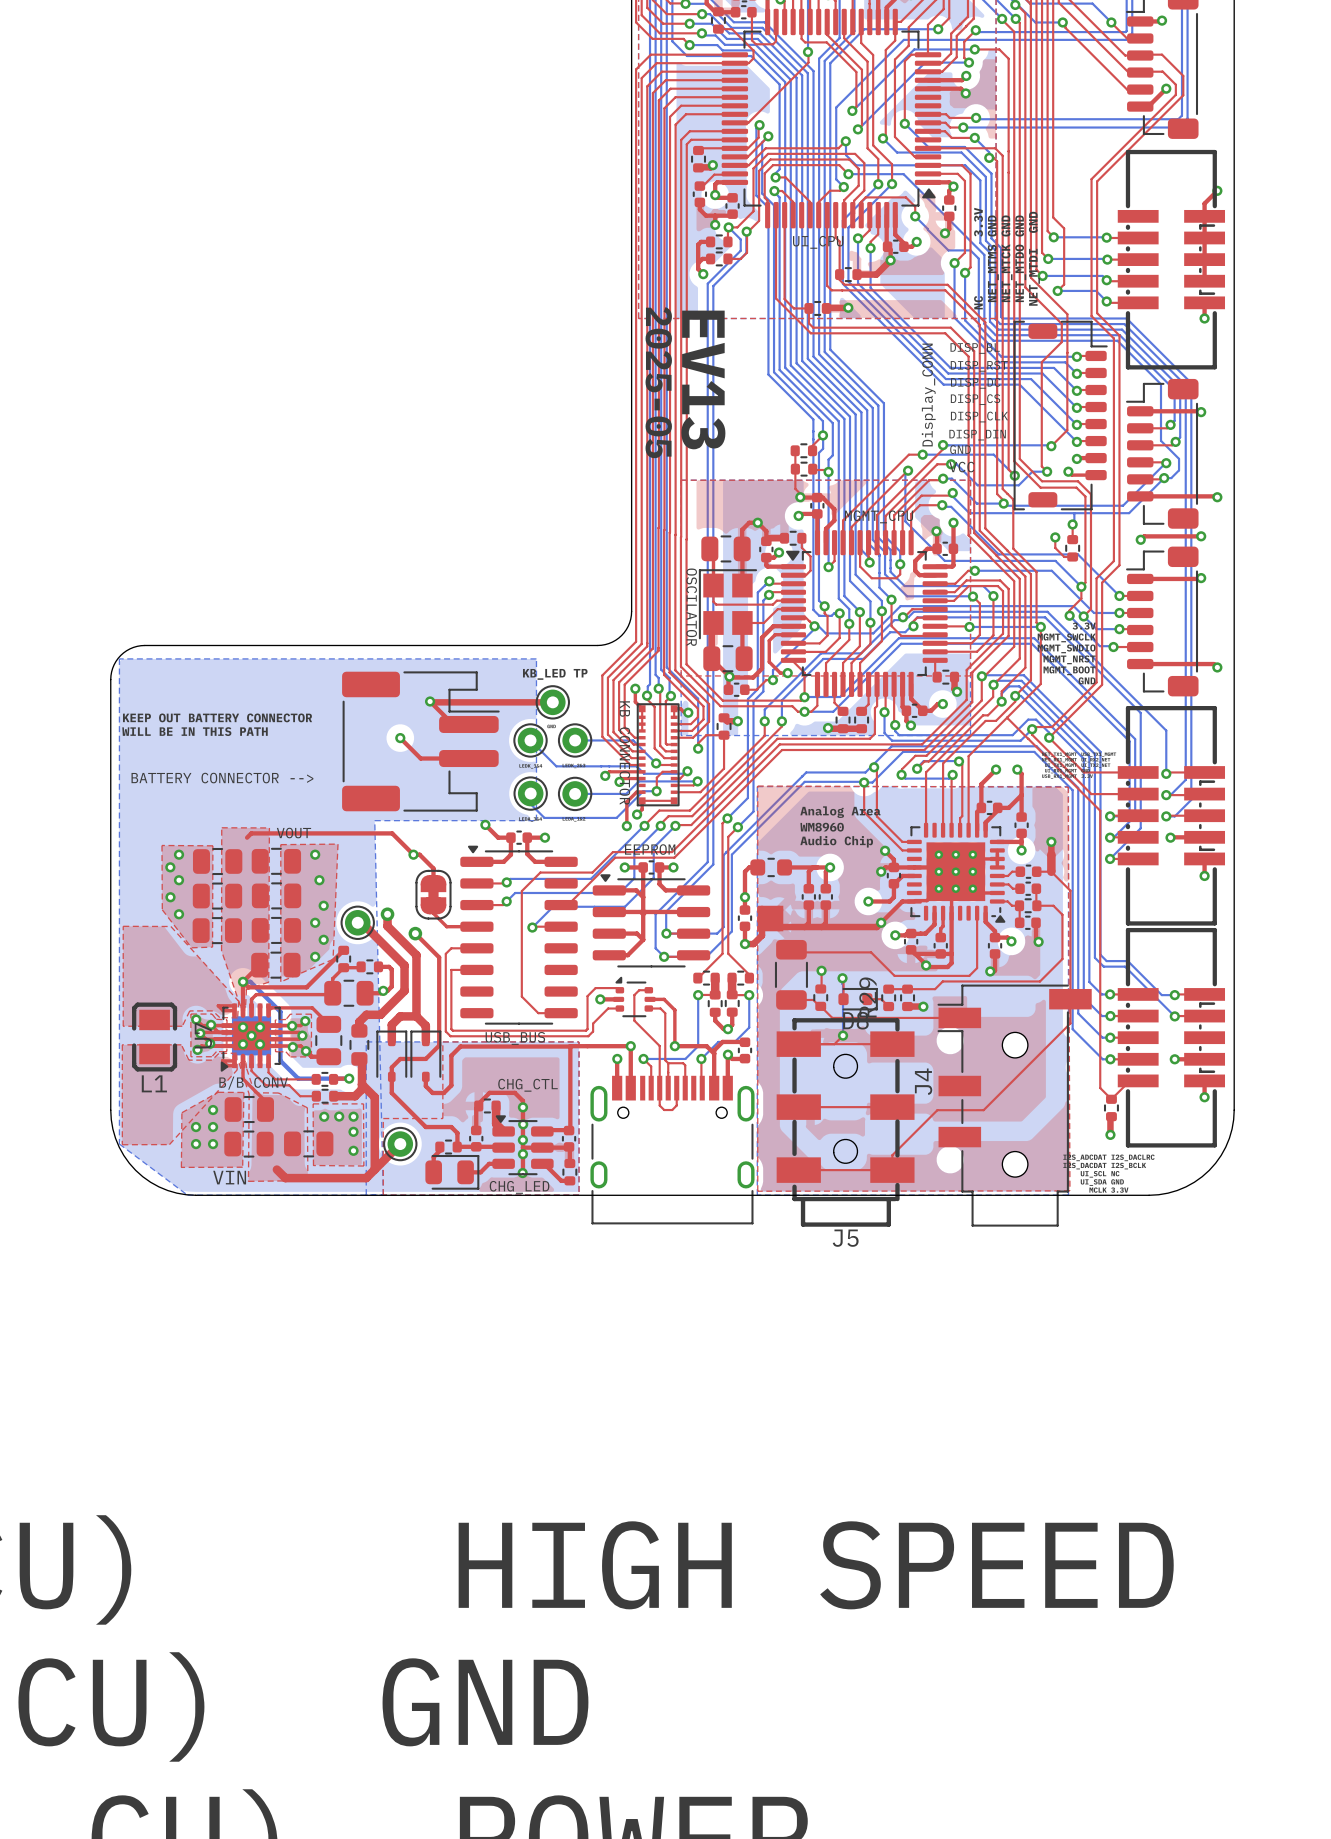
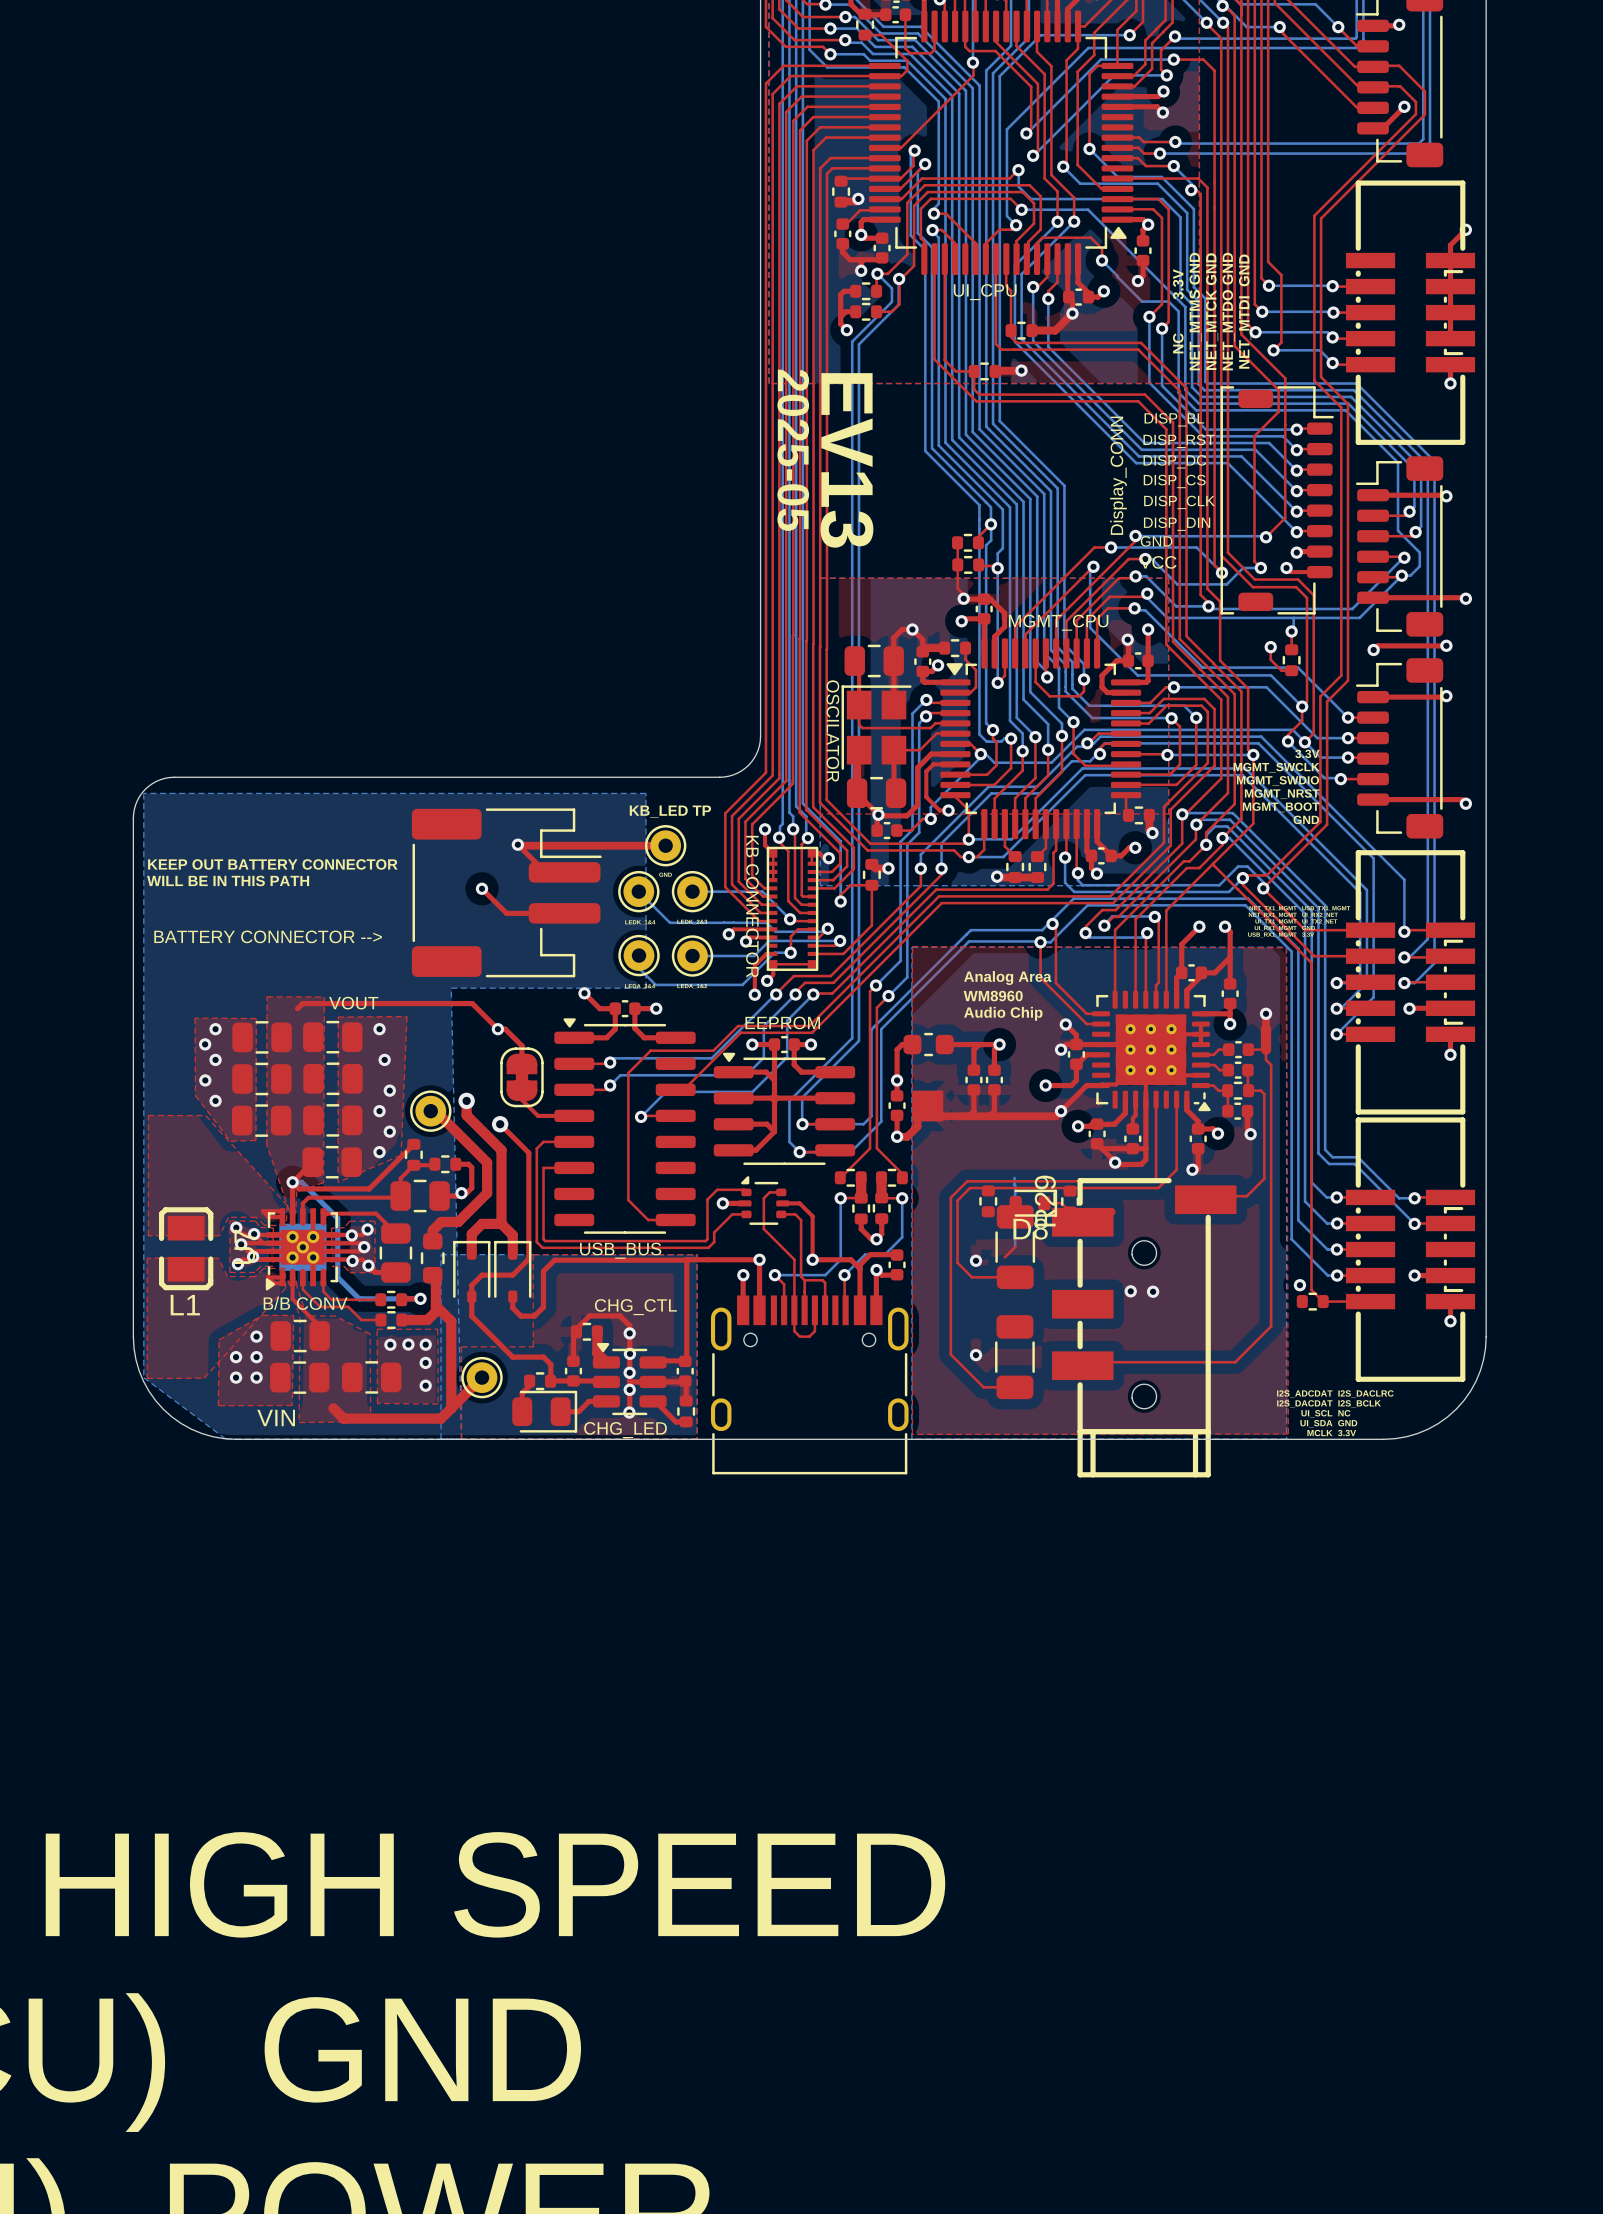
top track: (1089, 799) (1100, 810) (1100, 1088) (1111, 1099) (1129, 1080) -> (1311, 962) (1311, 1289) (1323, 1301) (1360, 1301)
top track: (1051, 871) (1070, 890) (1070, 1023) (983, 1110) (937, 1110) (892, 1155) (892, 1170) (798, 1170) -> (1266, 1049) (1266, 1059) (1271, 1065) (1271, 1326) (1235, 1362) (1086, 1362) (1081, 1365)
top track: (1047, 905) (1053, 905) (1062, 914) (1062, 959) (1040, 981) (942, 981) (935, 989) (888, 989) -> (1260, 1090) (1264, 1094) (1264, 1178) (1246, 1196) (1209, 1196) (1205, 1199) (1205, 1198)
top track: none -> (1156, 1099) (1156, 1178) (1152, 1181) (967, 1181) (950, 1197) (950, 1354) (983, 1387) (1014, 1387)
top track: (791, 949) (794, 952) (871, 952) (894, 975) (969, 975) (977, 968) -> (1015, 1277) (972, 1277) (957, 1262) (957, 1200) (970, 1188) (1158, 1188) (1176, 1169) (1176, 1165)
top track: (821, 970) (821, 988) -> none
via: (821, 970) -> none
part position: (791, 974) -> (1015, 1247)
top track: (842, 978) (843, 999) -> none
via: (842, 978) -> none
part: (907, 997) -> none
top track: (791, 999) (813, 999) (832, 1017) (959, 1017) -> none
via: (923, 1006) -> none
via position: (843, 1035) -> (975, 1260)
top track: (798, 1044) (892, 1044) -> none
via: none -> (1130, 1291)
via: none -> (1153, 1291)
part: none -> (1144, 1327)
J4: (1014, 1105) -> none
top track: (798, 1107) (892, 1107) -> none
part rotation: 0° (1111, 1107) -> 90° clockwise (1312, 1301)
part position: (1111, 1107) -> (1312, 1301)
top track: (1111, 1116) (1110, 1134) -> none
J5: (845, 1122) -> none
via: none -> (975, 1355)
part: none -> (1014, 1357)
via position: (1110, 1134) -> (1299, 1285)

